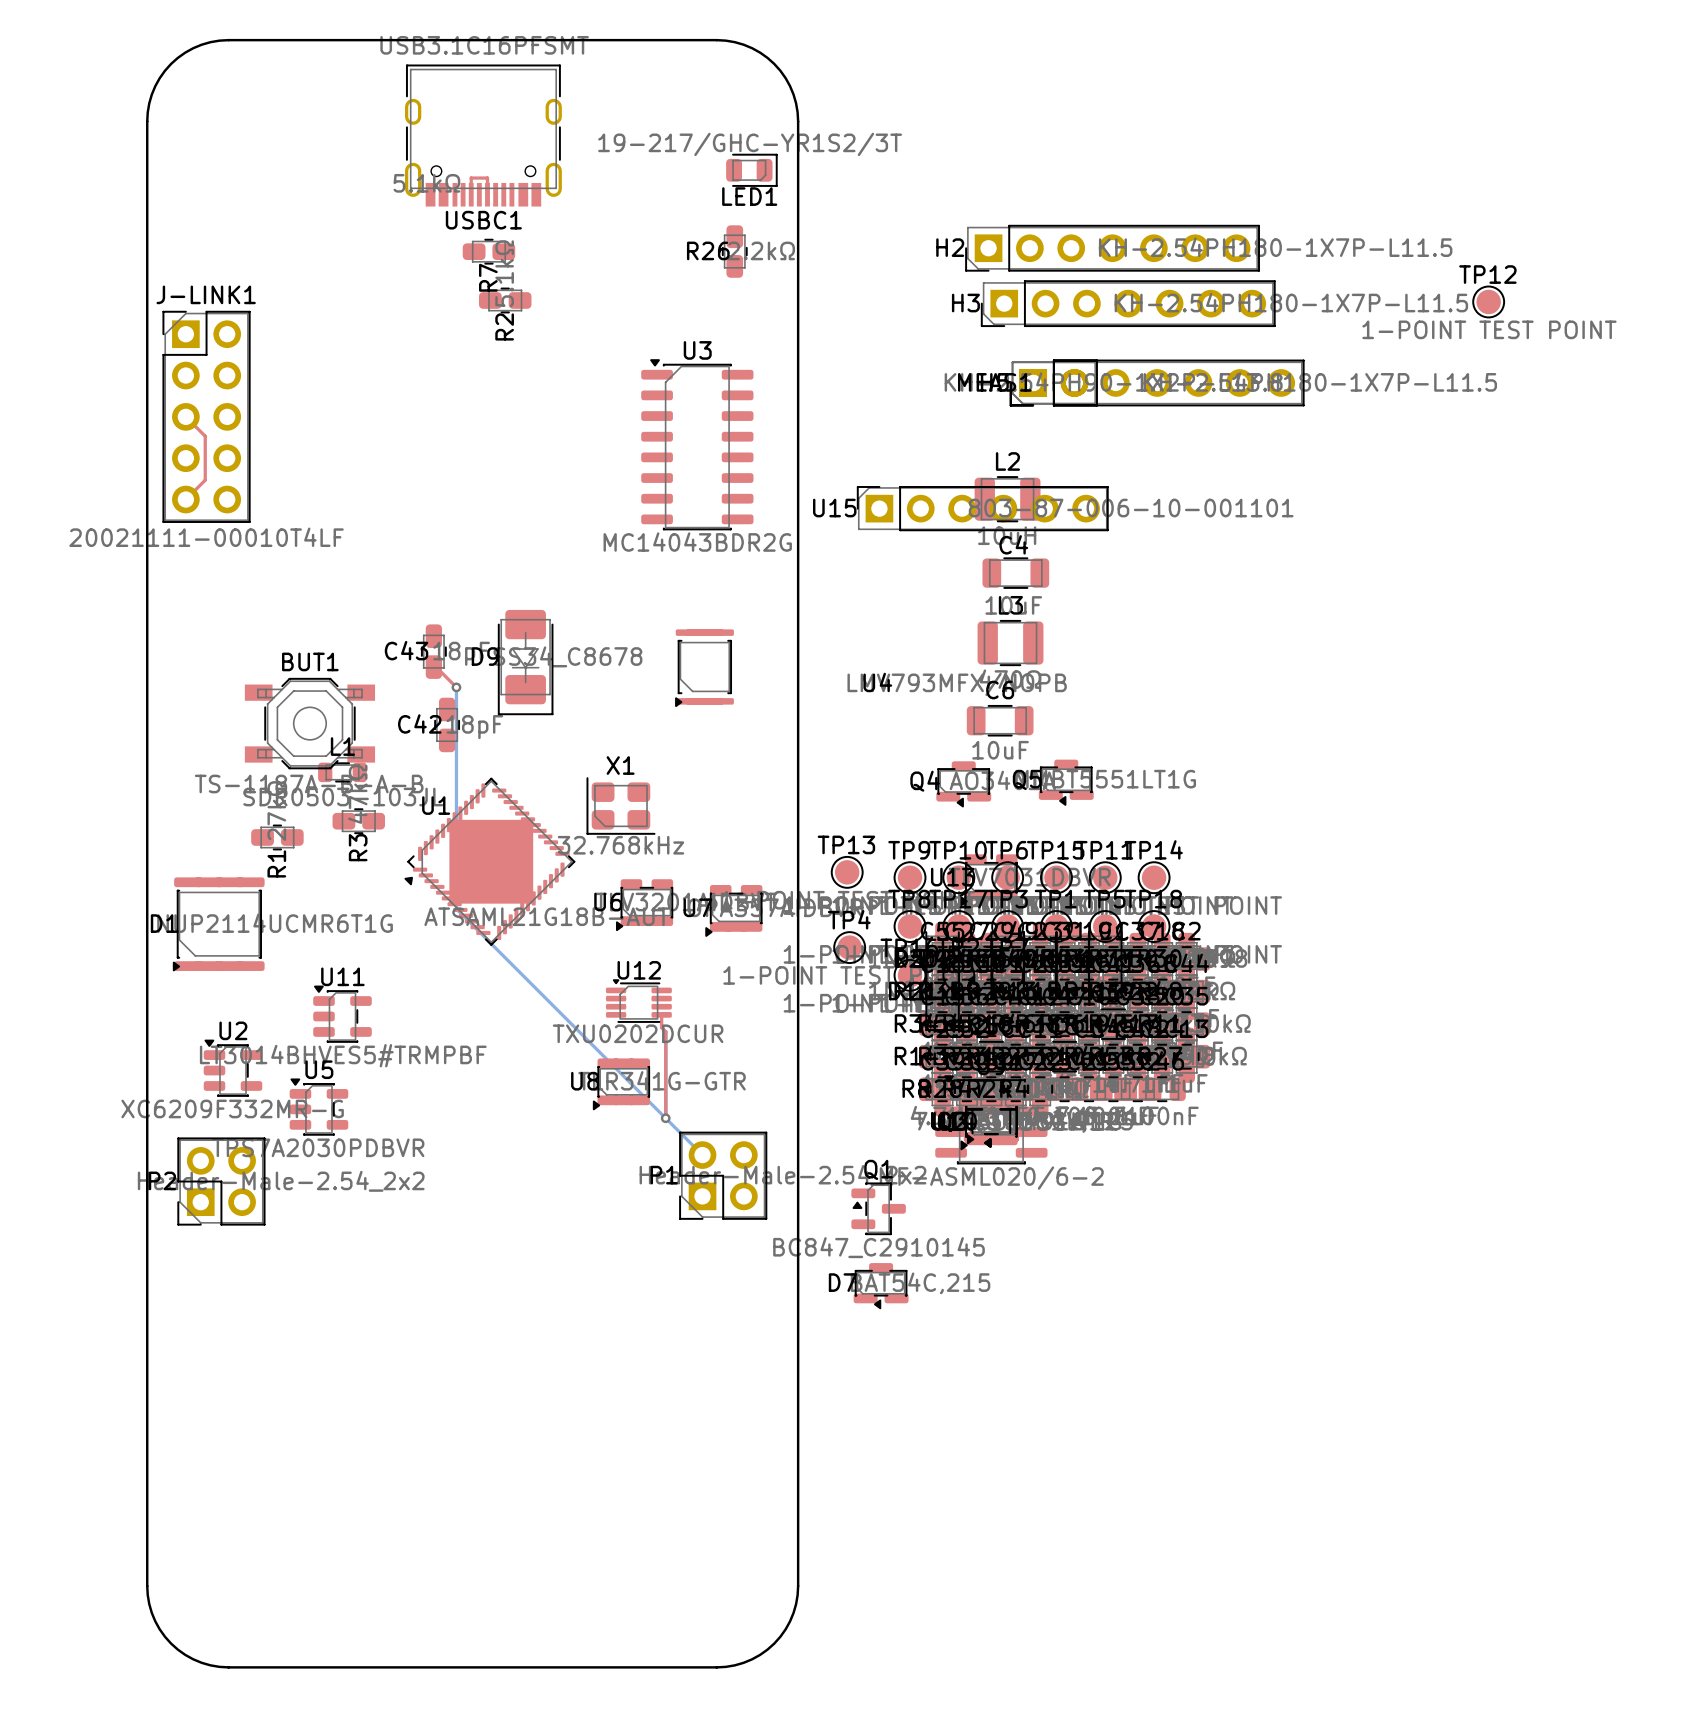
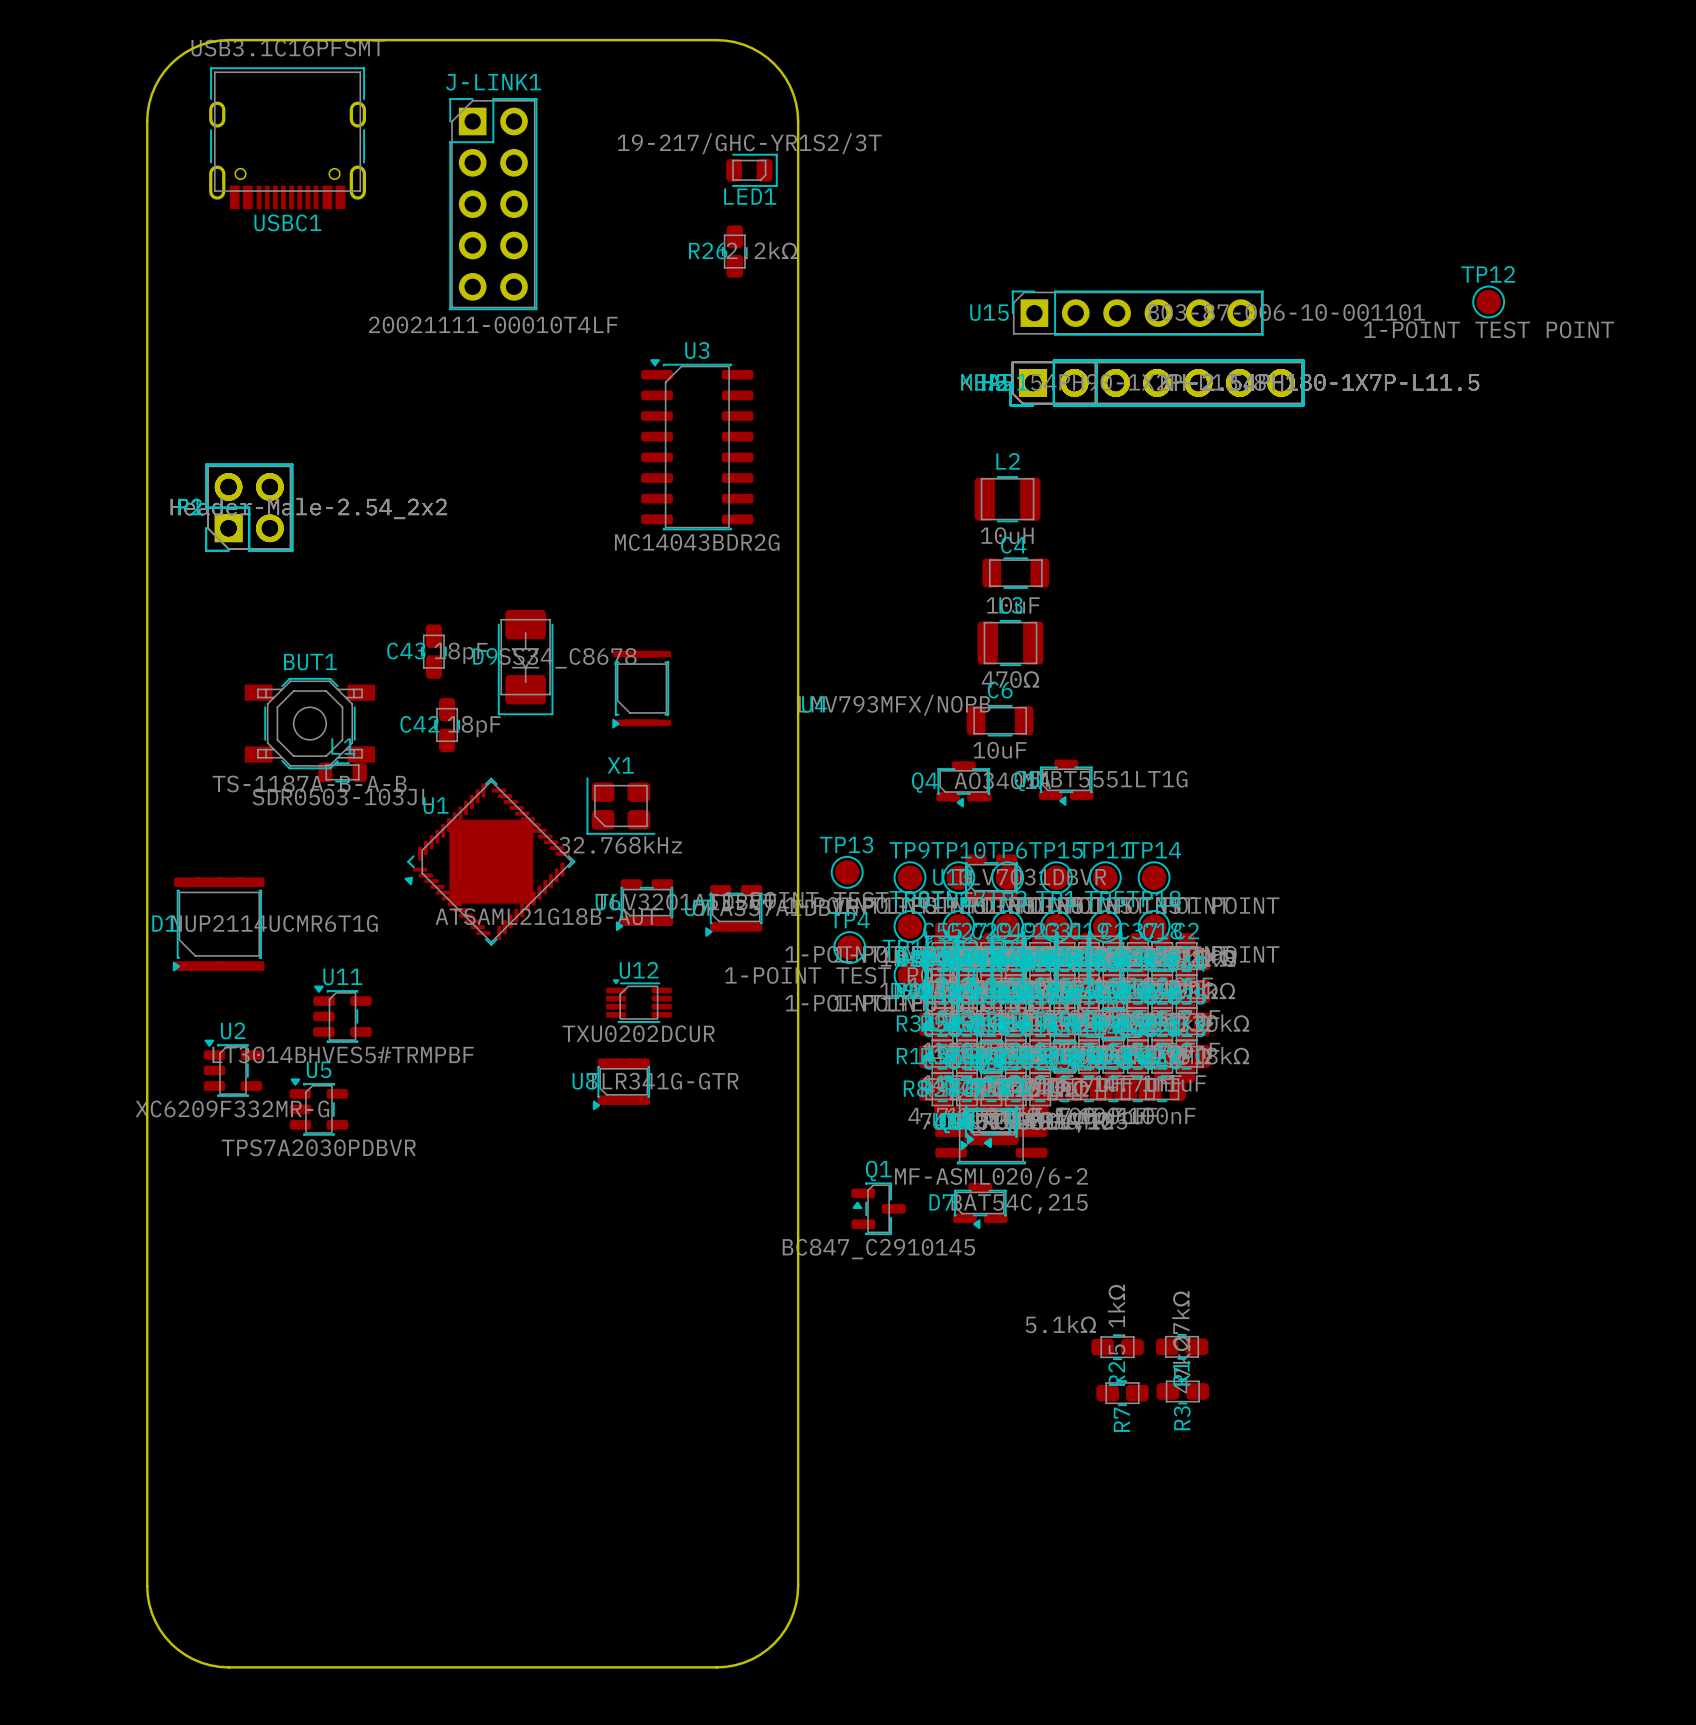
USBC1 position: (483, 135) -> (287, 138)
top track: (471, 194) (471, 178) (487, 178) (487, 194) -> none
H2 position: (1112, 248) -> (1157, 382)
R7 position: (488, 251) -> (1122, 1393)
R2 position: (505, 300) -> (1117, 1347)
H3 position: (1128, 303) -> (1157, 382)
top track: (185, 416) (205, 436) (205, 480) (185, 499) -> none
J-LINK1 position: (206, 416) -> (493, 204)
U15 position: (982, 508) -> (1137, 313)
top track: (433, 667) (436, 667) (456, 689) -> none
U4 position: (704, 668) -> (641, 689)
bottom track: (456, 687) (456, 909) (702, 1155) -> none
via: (456, 687) -> none
R3 position: (358, 821) -> (1182, 1391)
R1 position: (277, 837) -> (1182, 1346)
top track: (661, 1014) (661, 1027) (665, 1031) (665, 1118) -> none
via: (665, 1118) -> none
P1 position: (723, 1175) -> (249, 507)
P2 position: (221, 1181) -> (249, 507)
D7 position: (881, 1286) -> (980, 1205)

